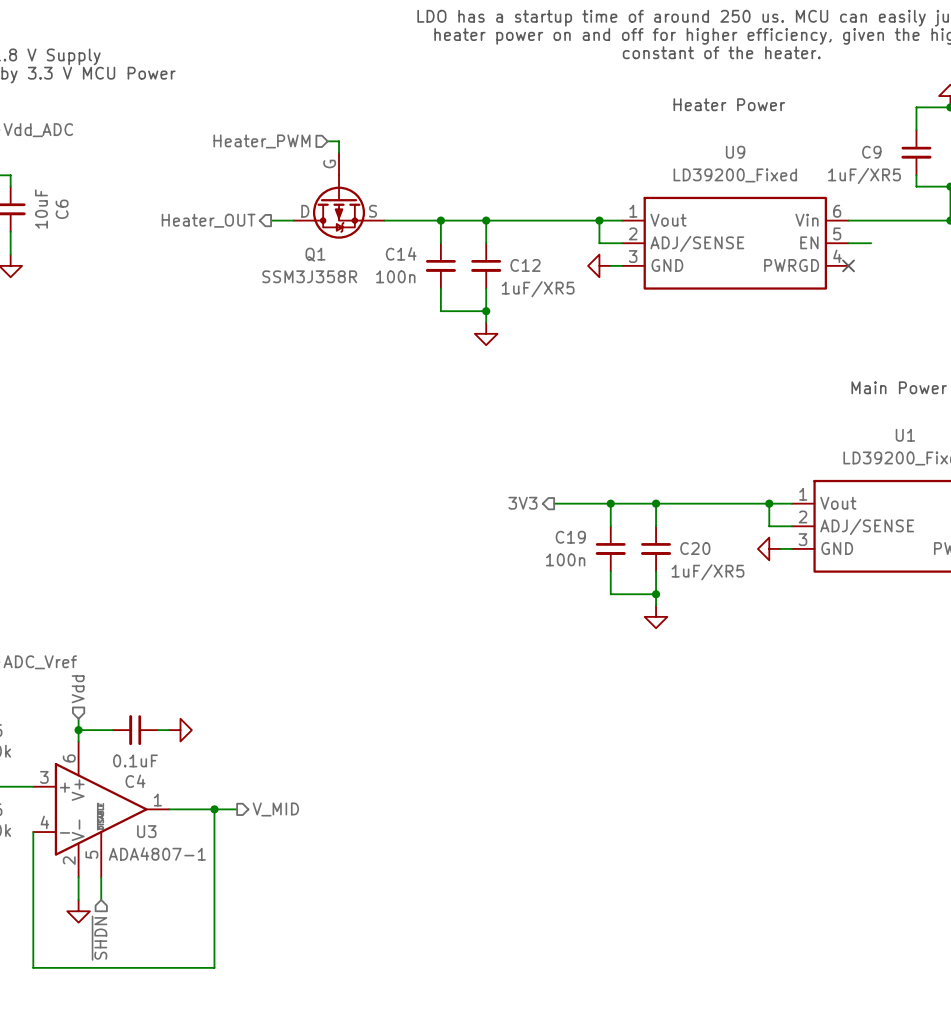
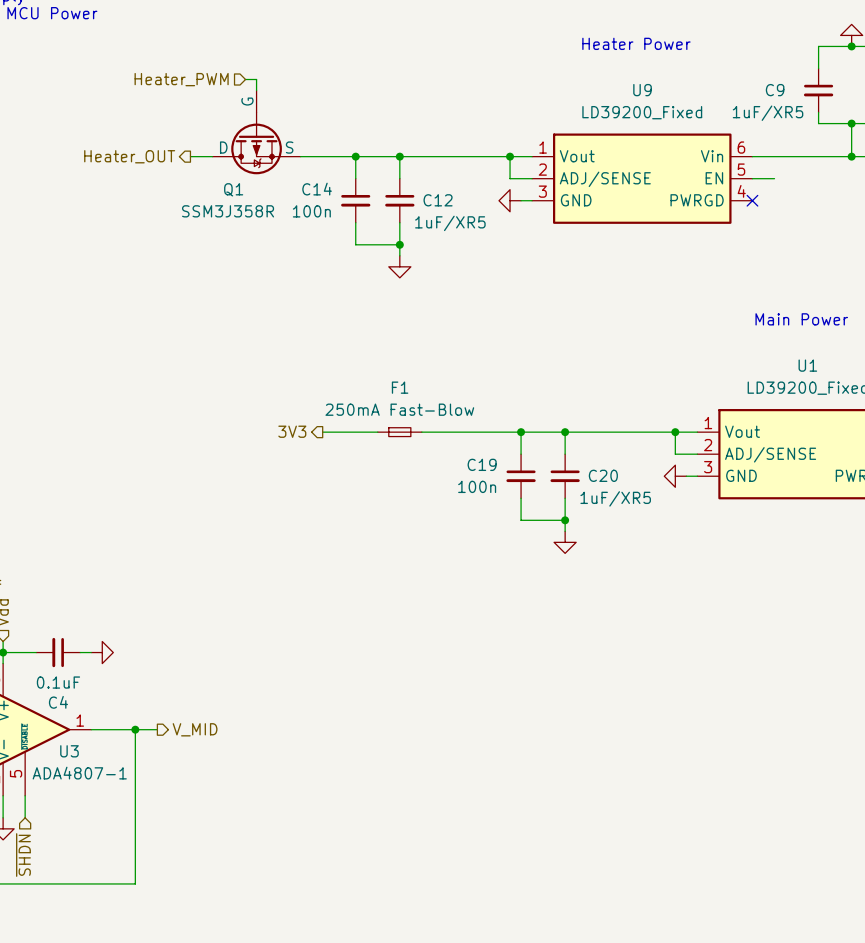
wire: none -> (322, 432) (377, 432)
F1: none -> 250mA Fast-Blow (399, 432)
wire: none -> (421, 432) (465, 432)
hierarchical label position: 3V3 (522, 503) -> 3V3 (292, 431)

